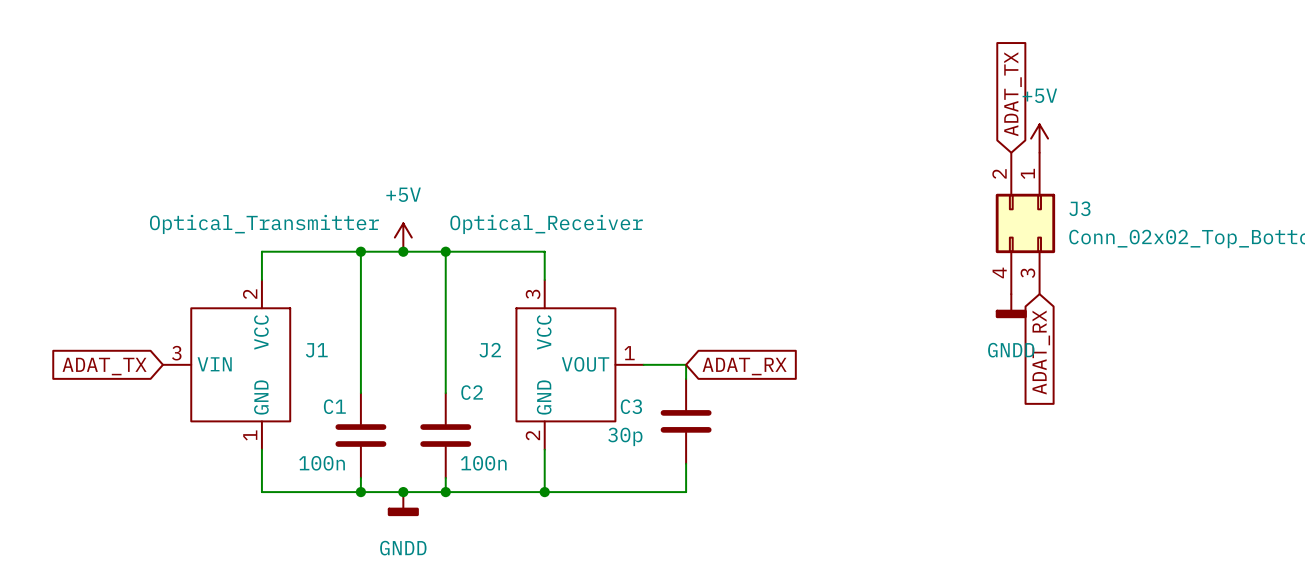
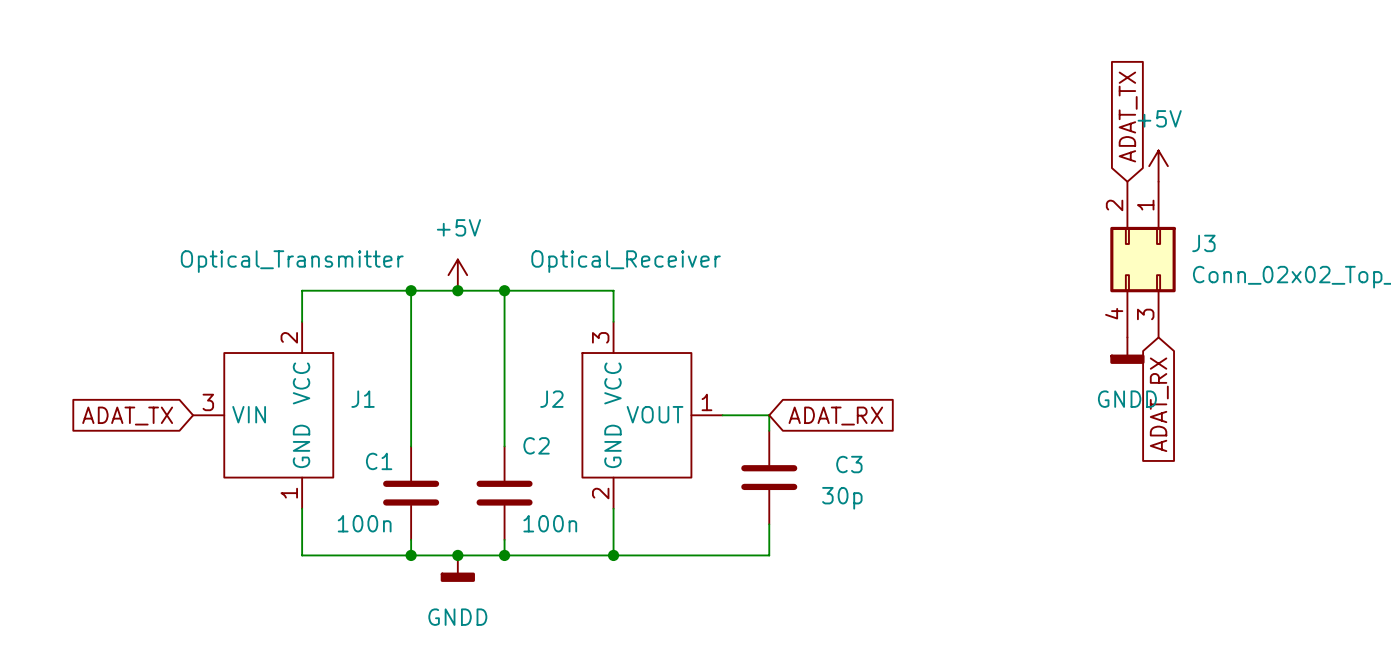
C3 name position: C3 (631, 406) -> C3 (849, 464)
C3 value position: 30p (625, 436) -> 30p (842, 498)

